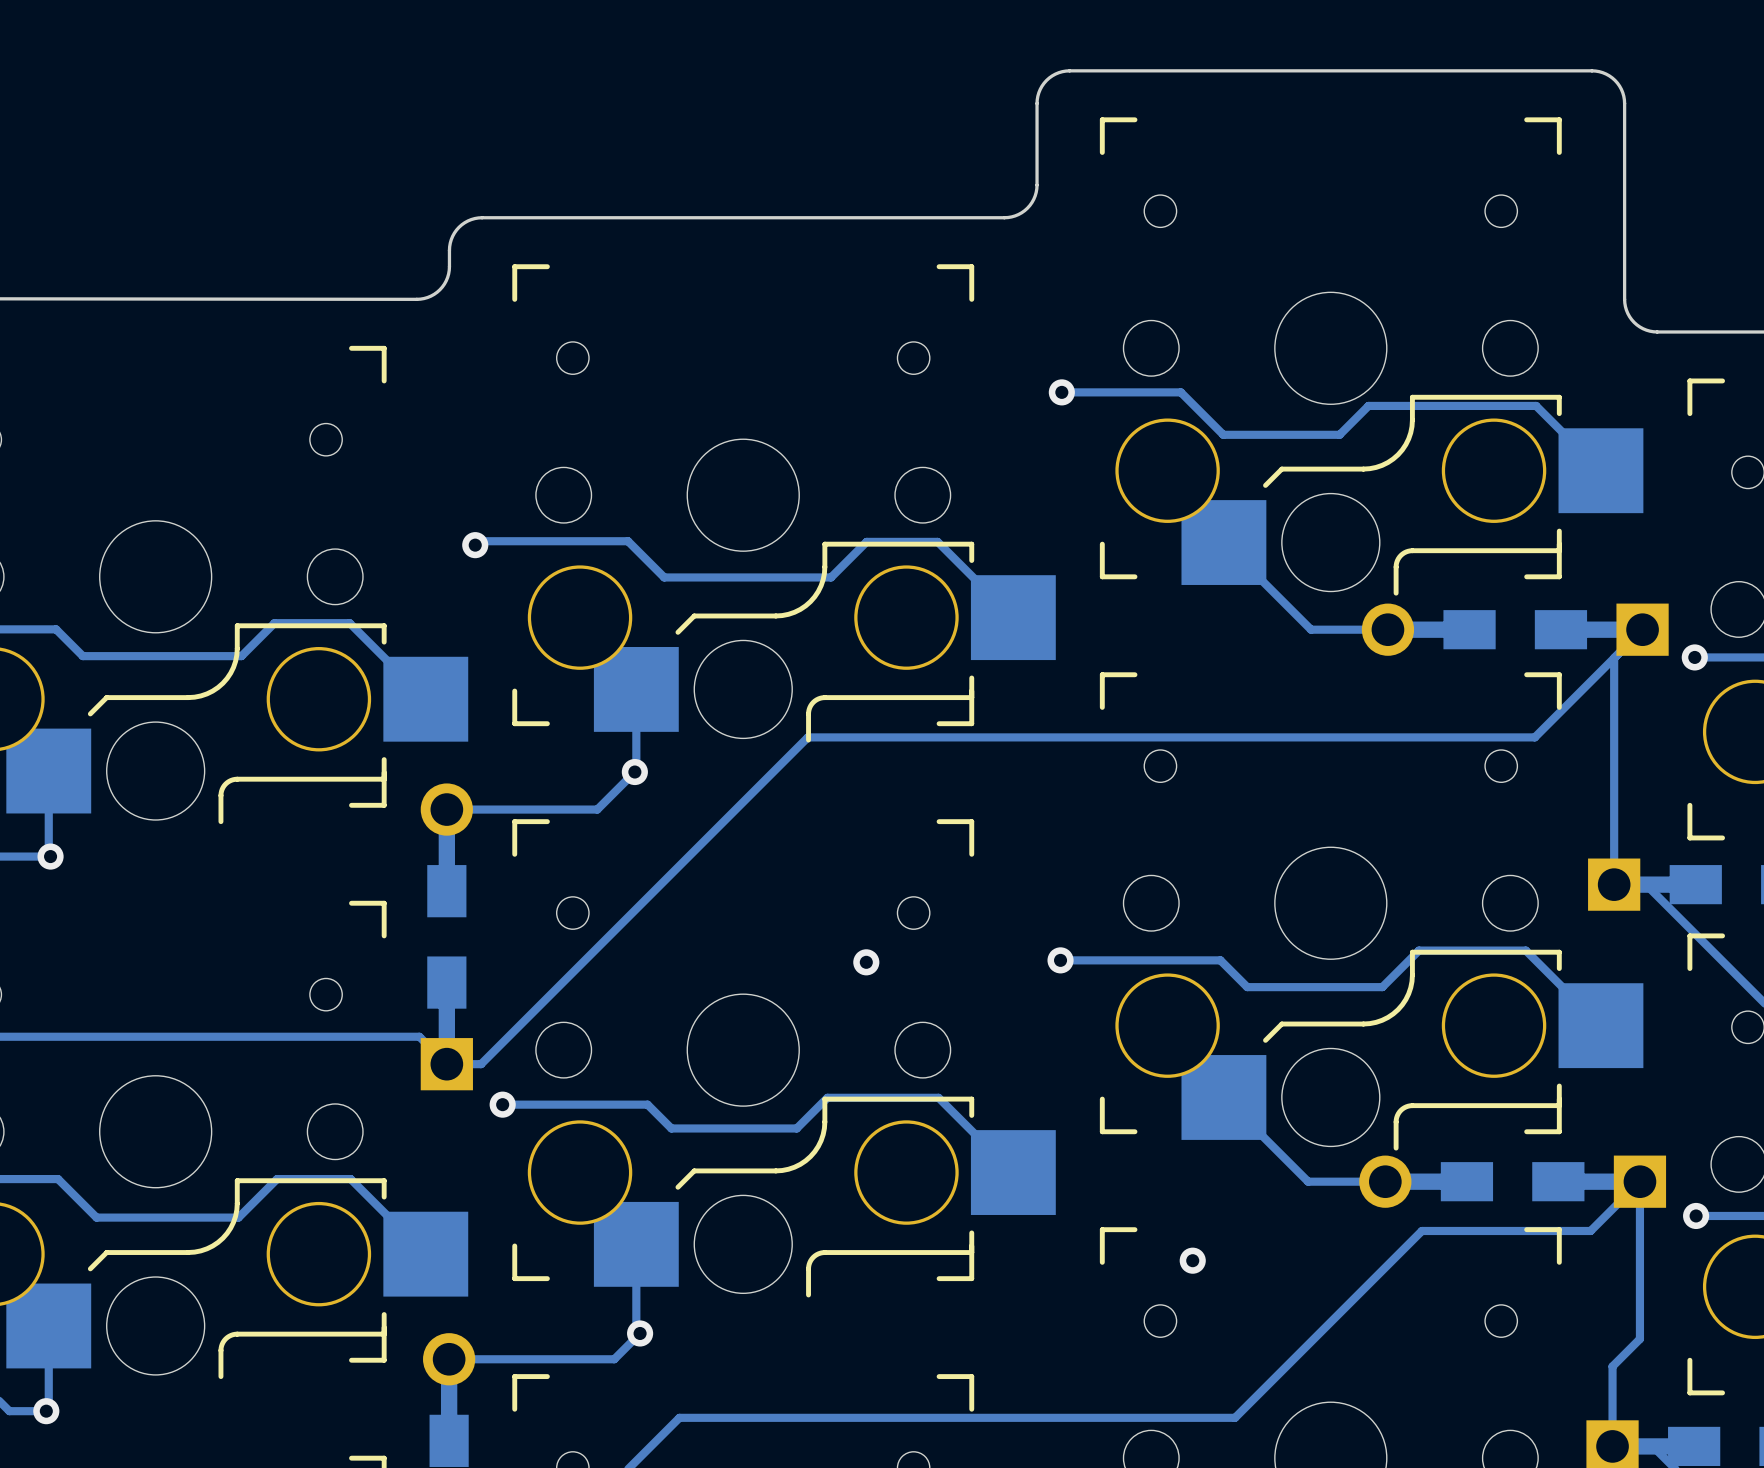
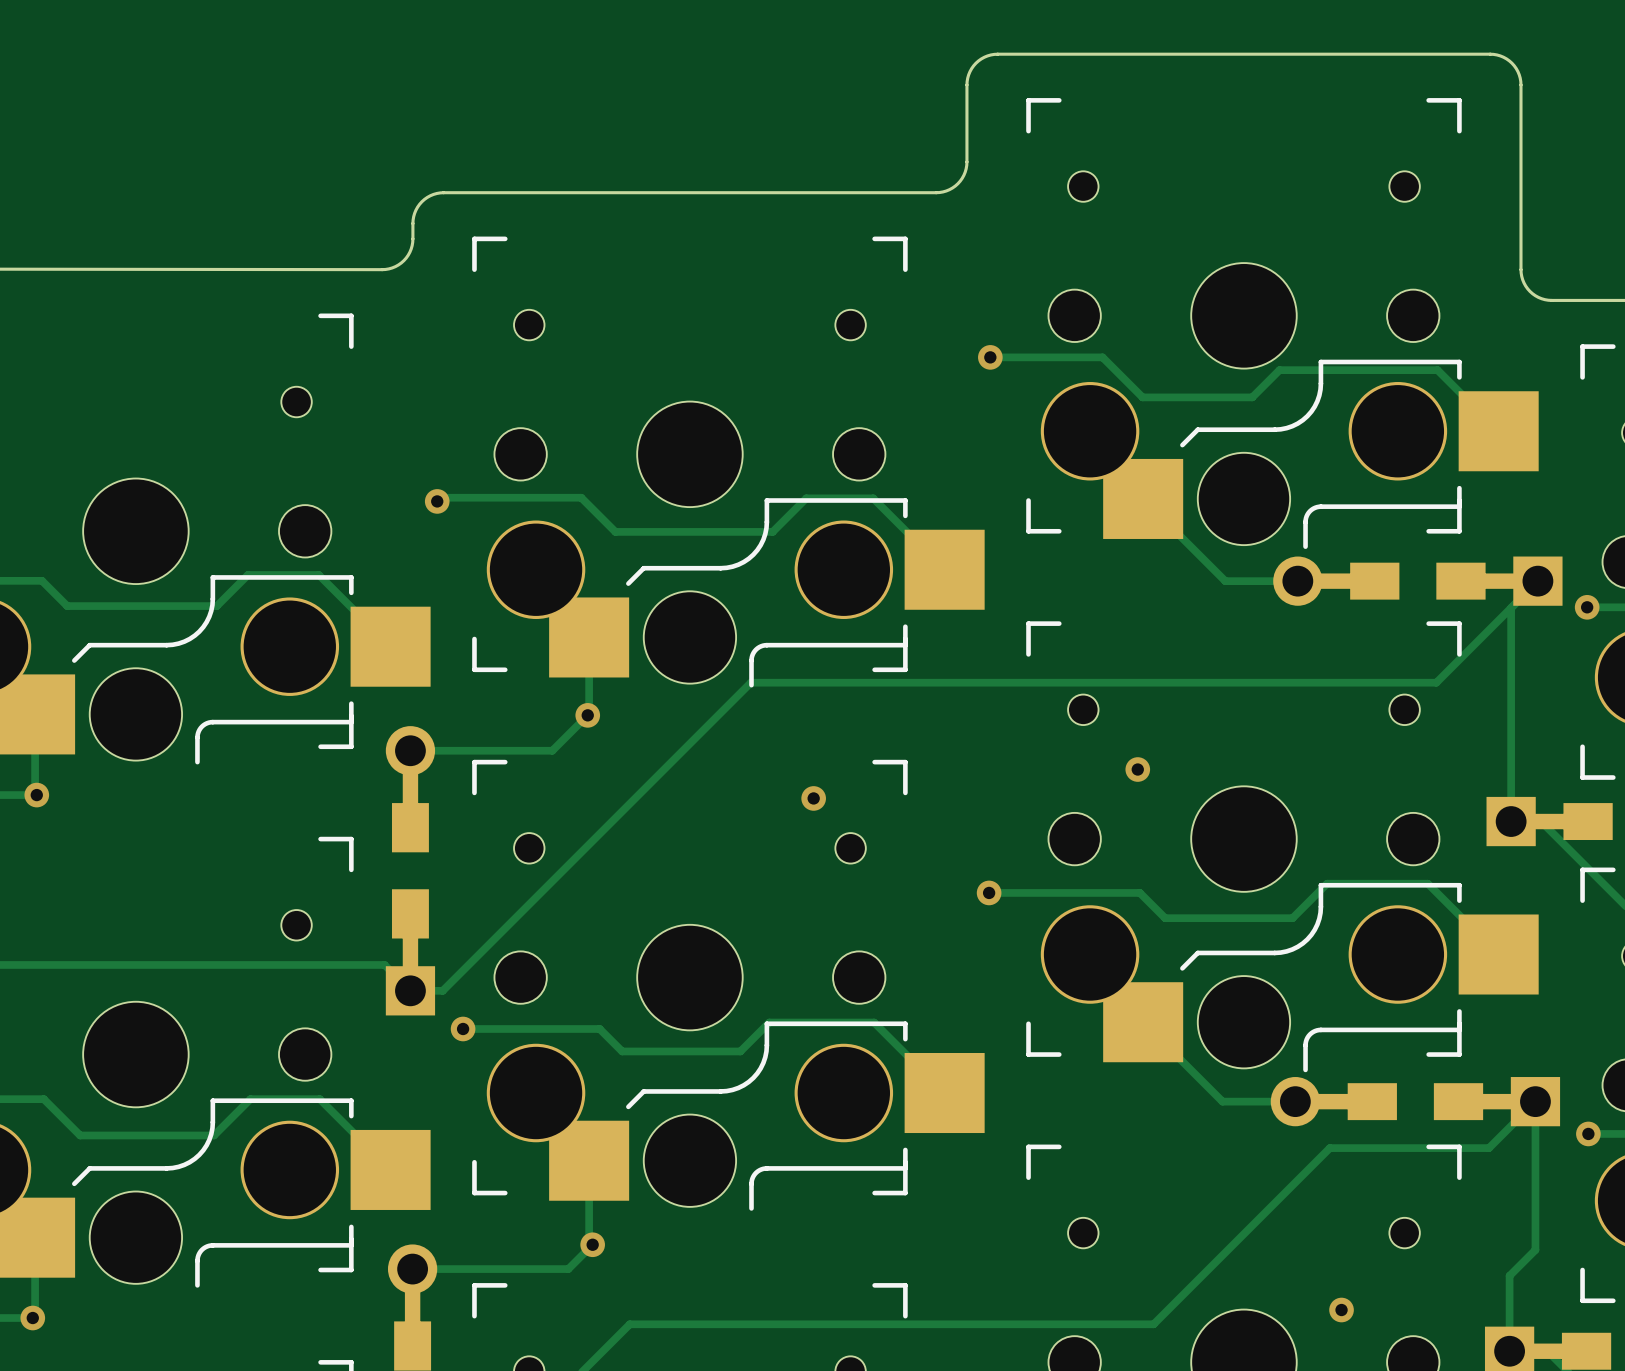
via: none -> (1137, 769)
via position: (866, 962) -> (813, 798)
via: (1192, 1260) -> none
via: none -> (1341, 1310)

